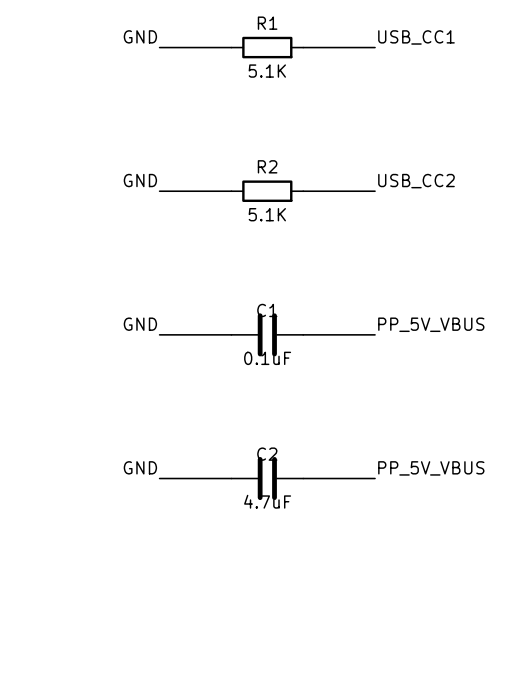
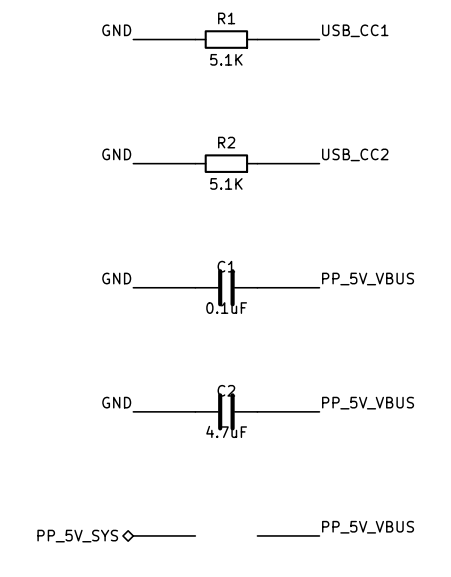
label: none -> PP_5V_VBUS (368, 527)
hierarchical label: none -> PP_5V_SYS (77, 536)
wire: none -> (133, 535) (195, 535)
wire: none -> (257, 535) (319, 535)

